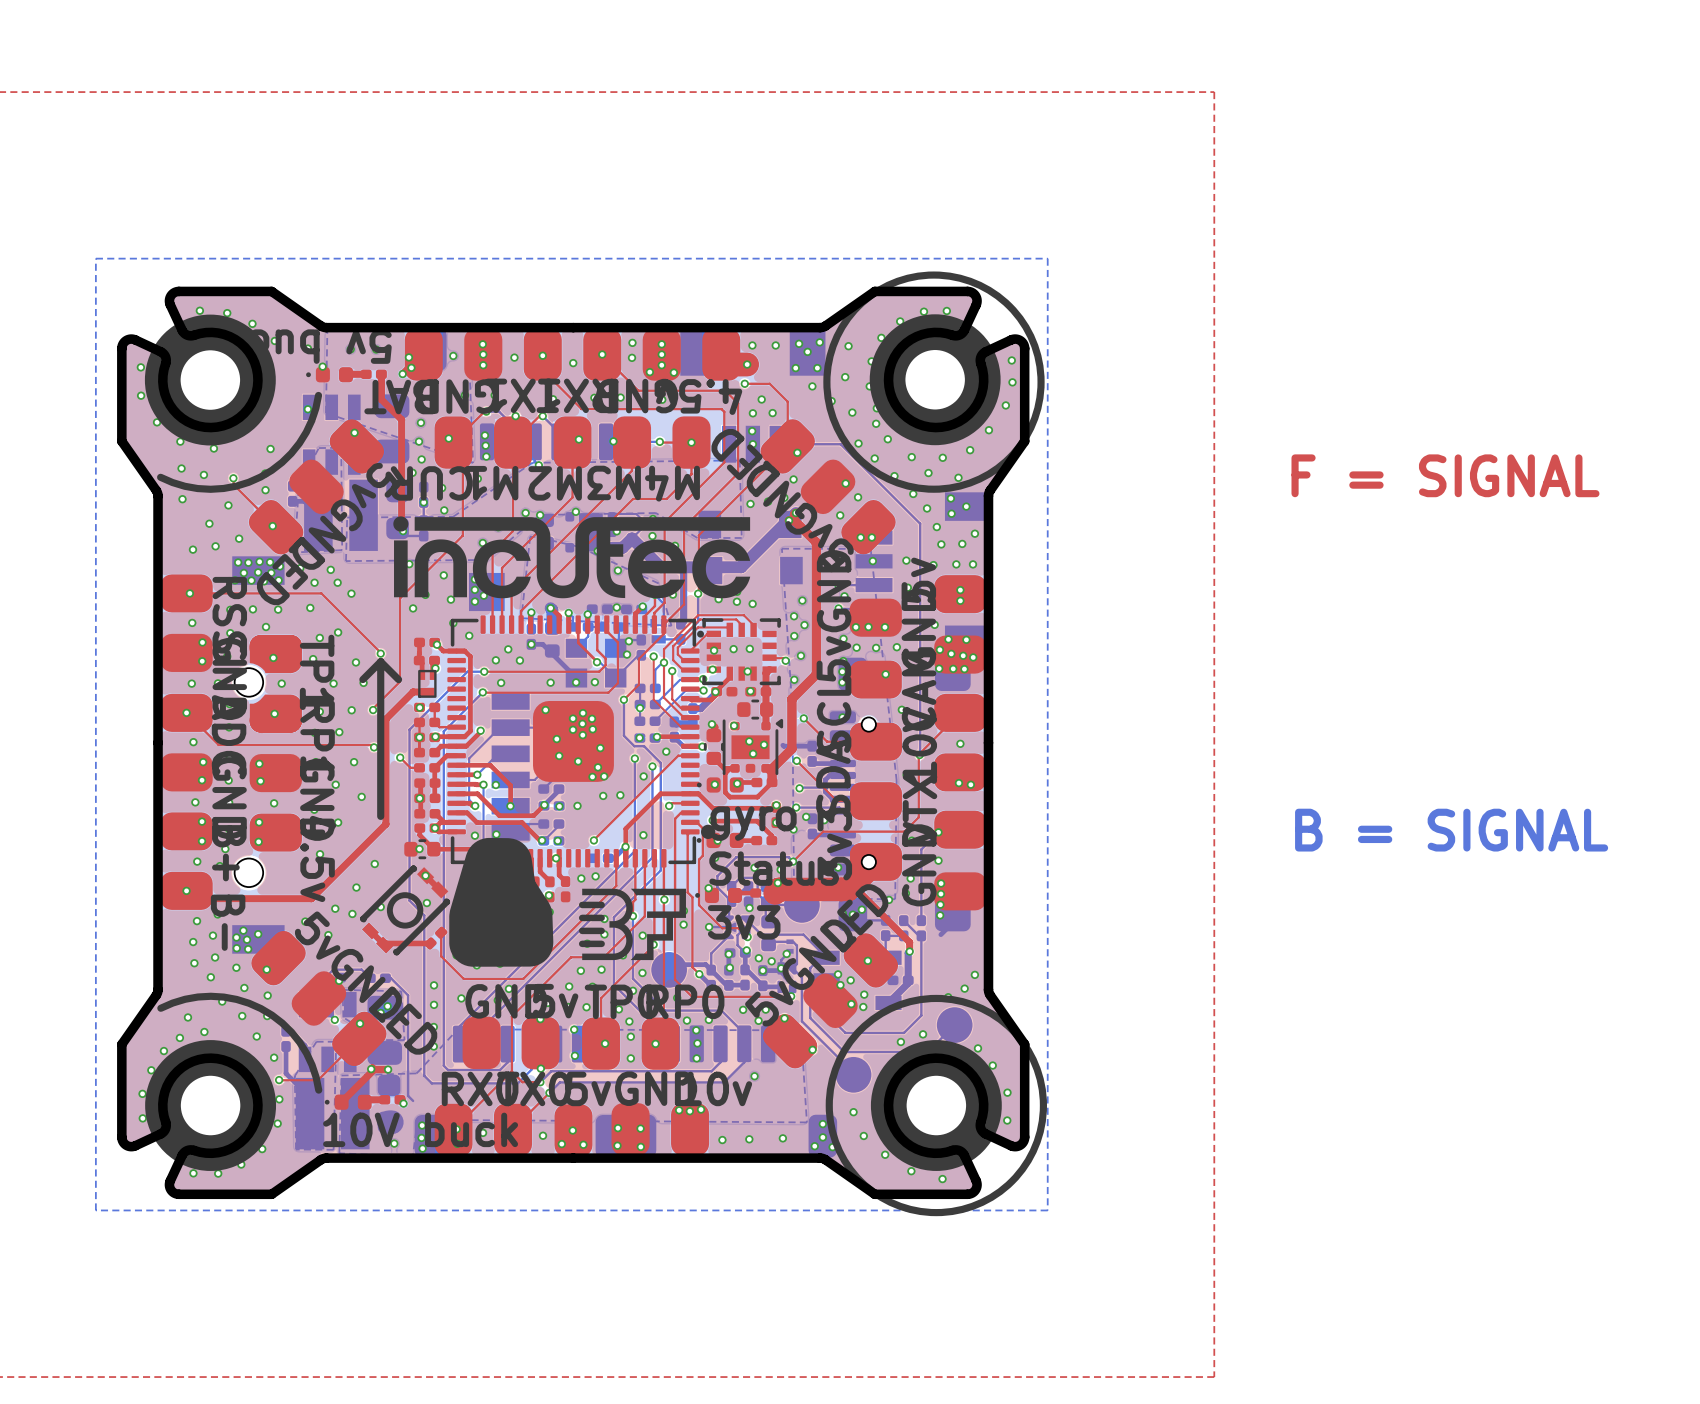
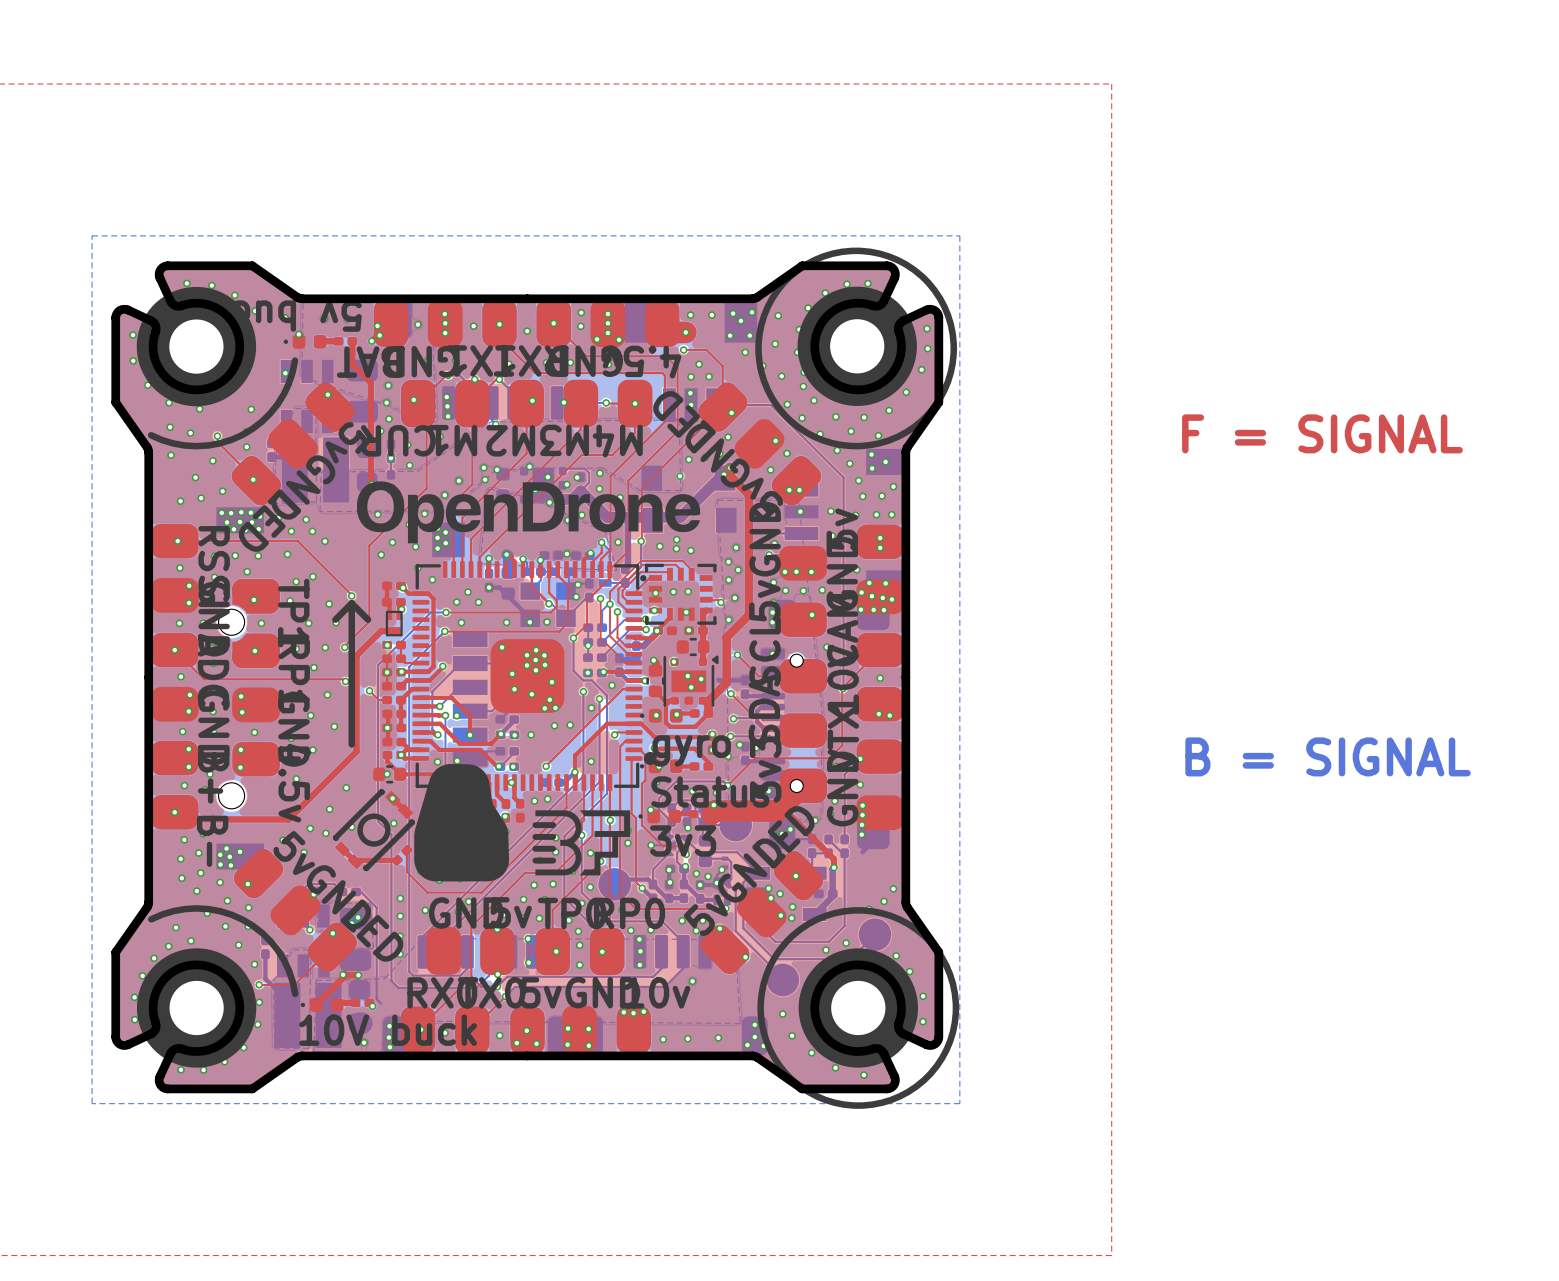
drawing: [393, 516, 468, 598] -> none
drawing shape: [414, 517, 751, 599] -> [522, 482, 565, 532]
drawing: none -> [356, 481, 445, 544]
drawing: [596, 530, 626, 599] -> none
drawing shape: [472, 539, 531, 599] -> [445, 494, 481, 533]
drawing shape: [627, 539, 687, 599] -> [589, 494, 626, 533]
drawing: [692, 539, 751, 599] -> none
drawing: none -> [483, 494, 518, 532]
drawing: none -> [568, 494, 590, 532]
drawing: none -> [628, 494, 701, 533]

